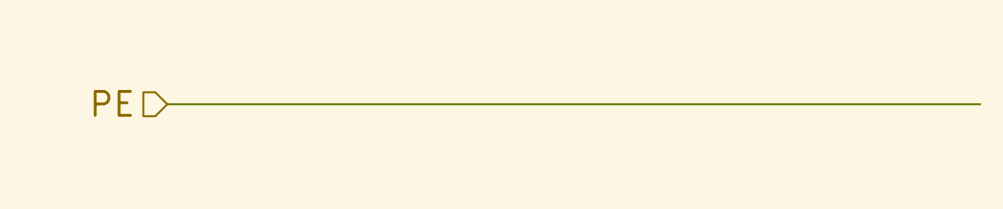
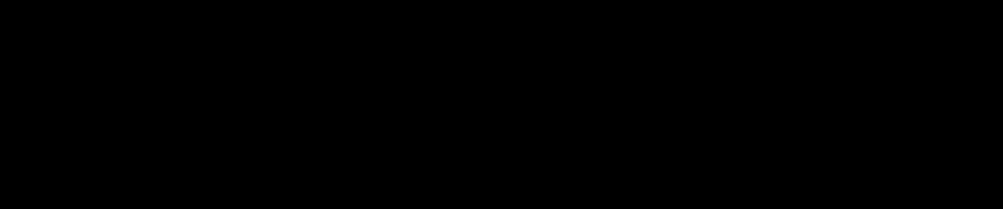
hierarchical label: PE (112, 103) -> none
wire: (167, 104) (980, 104) -> none

